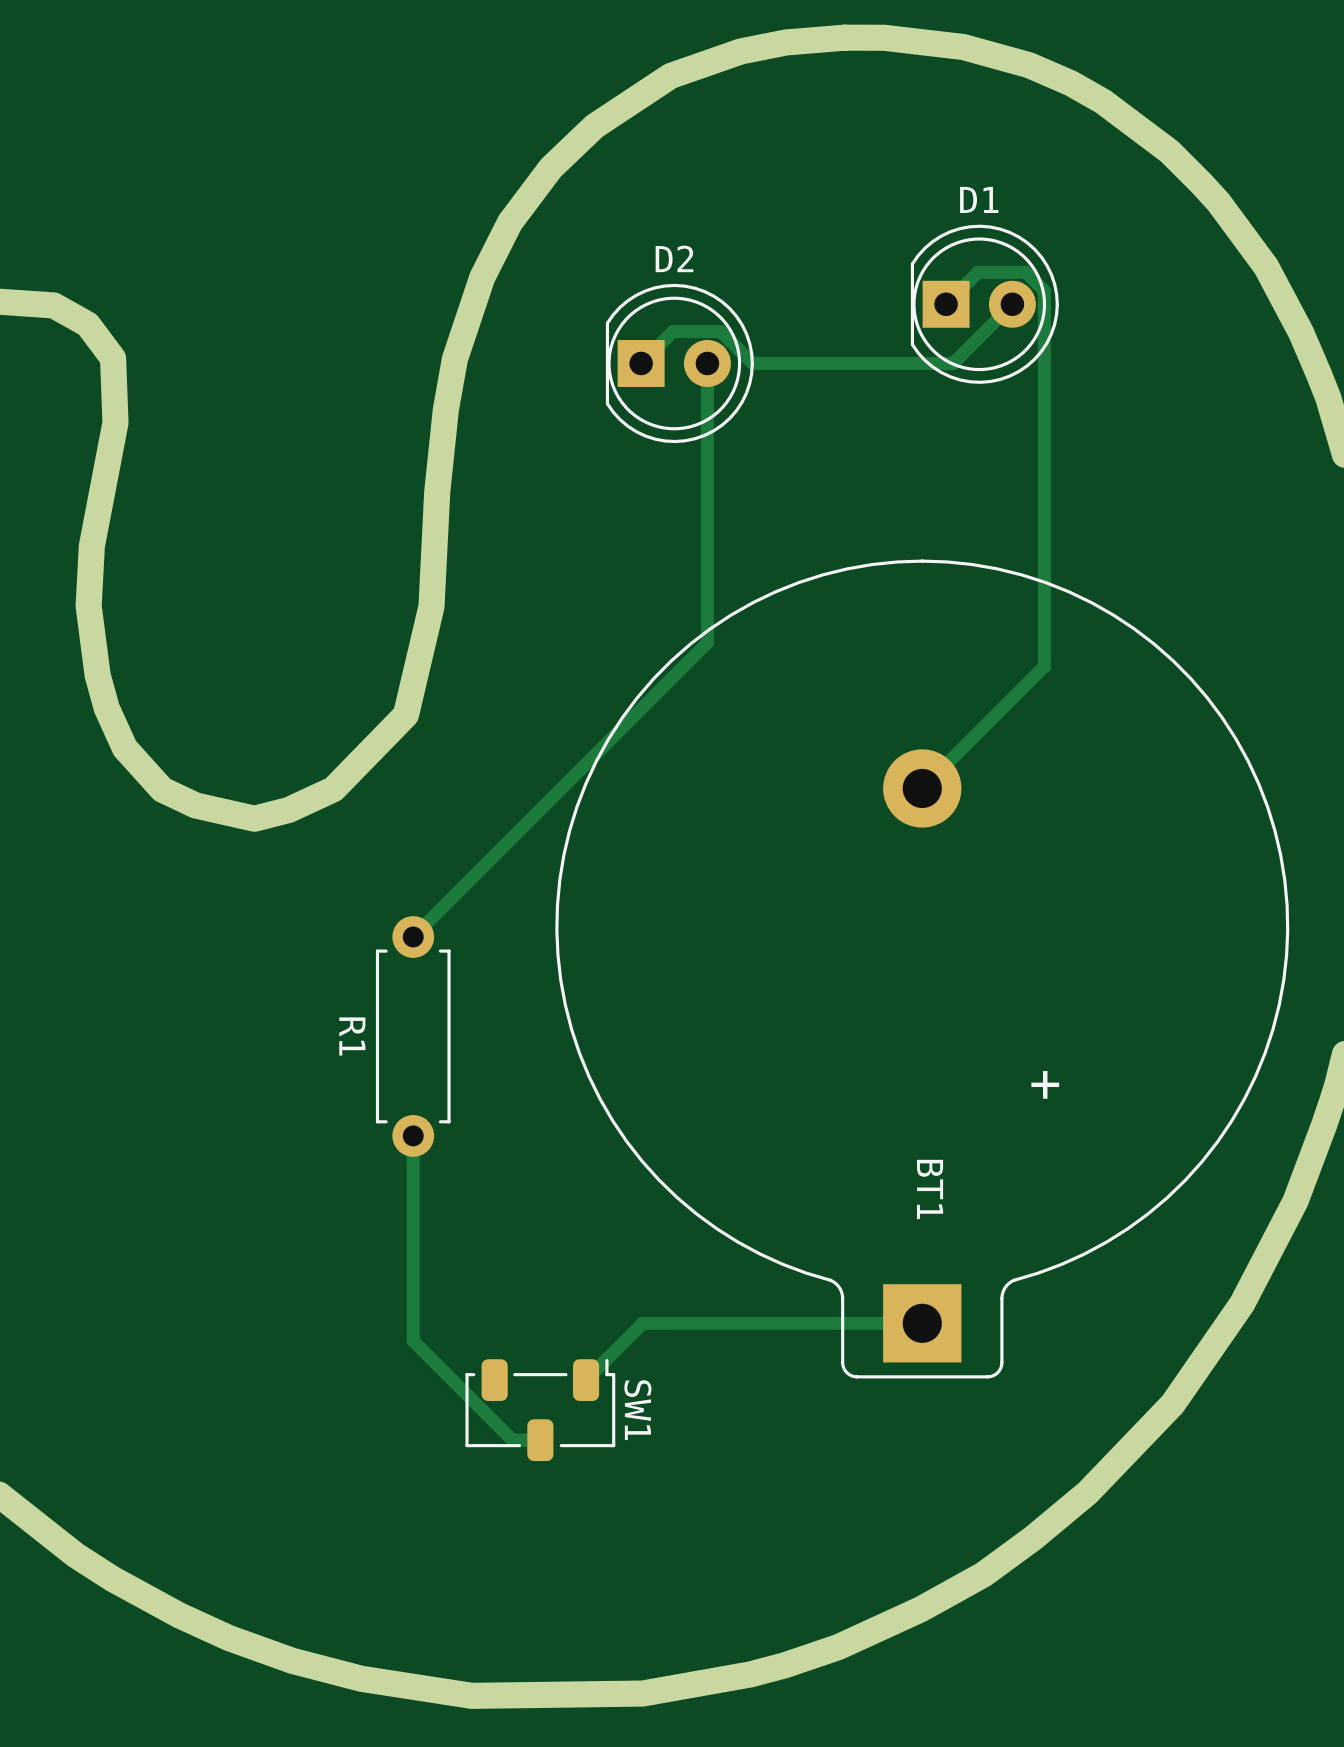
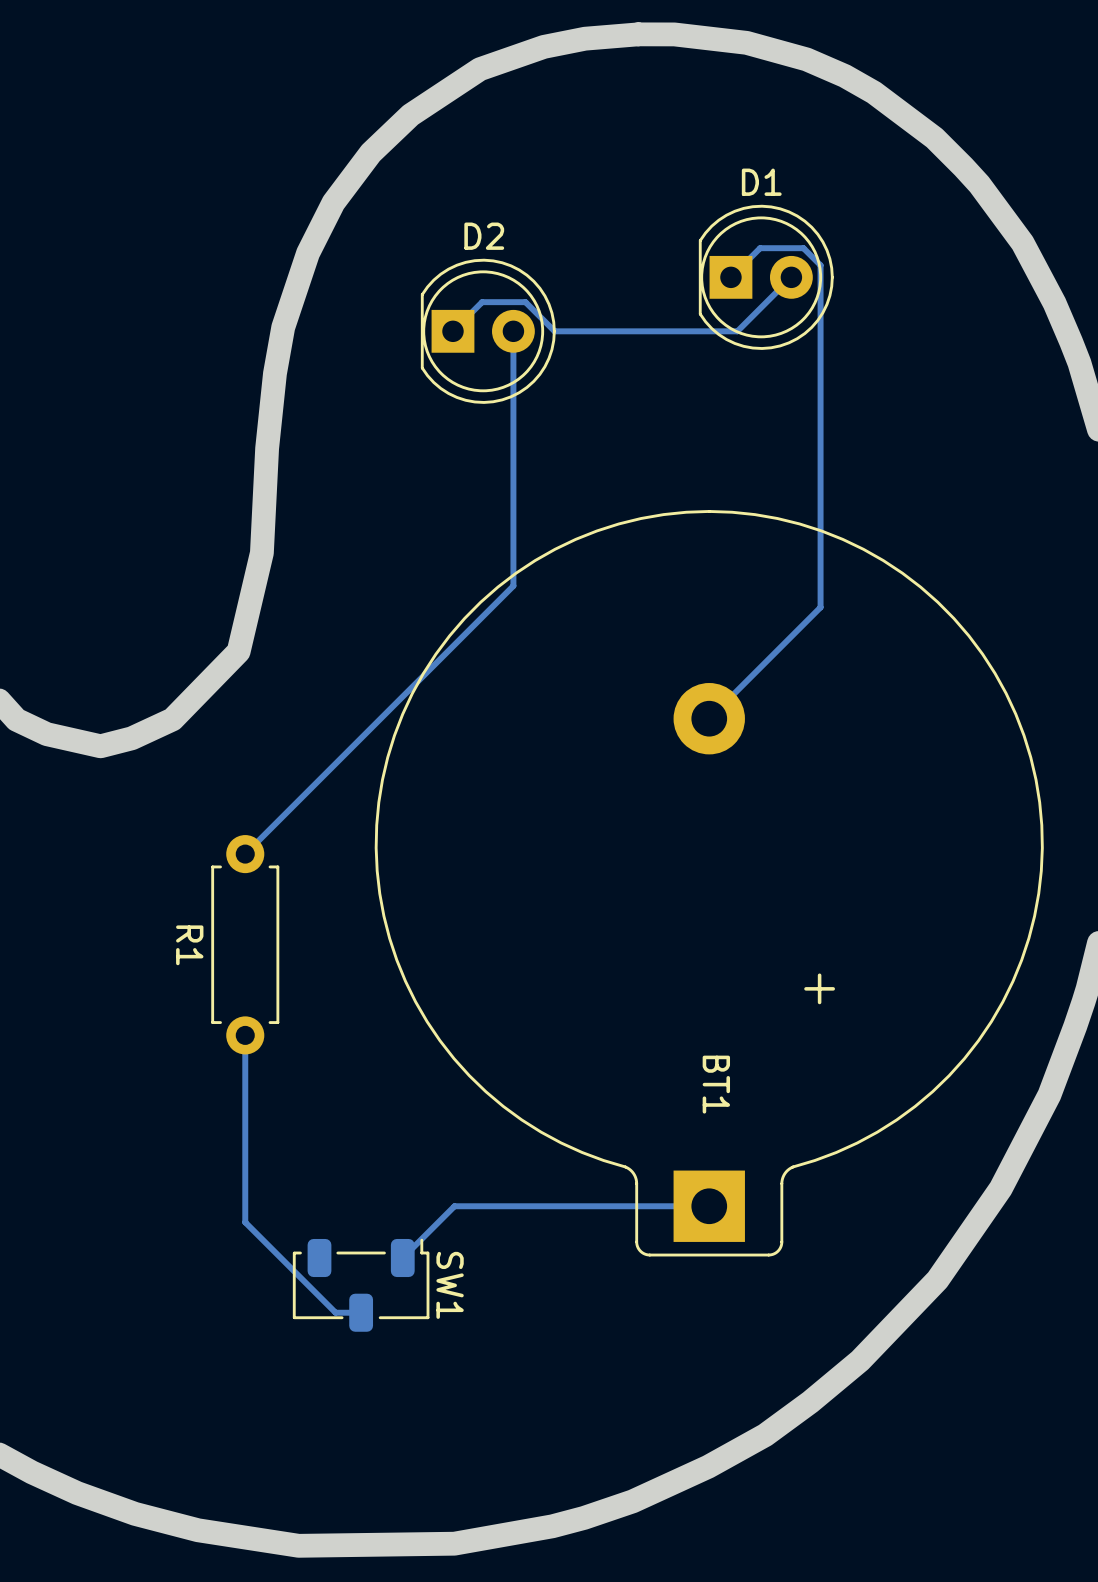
track width: thick (946, 304) (978, 272) (1025, 272) (1044, 291) (1044, 666) (922, 788) -> thin (730, 277) (760, 248) (803, 248) (820, 265) (820, 607) (709, 718)
track width: thick (1012, 304) (953, 363) (752, 363) (720, 331) (673, 331) (641, 363) -> thin (791, 277) (737, 331) (554, 331) (525, 302) (482, 302) (452, 331)
track width: thick (707, 363) (707, 642) (413, 936) -> thin (513, 331) (513, 585) (245, 854)
track width: thick (413, 1135) (413, 1341) (512, 1440) (540, 1440) -> thin (245, 1035) (245, 1222) (335, 1312) (361, 1312)
track width: thick (922, 1323) (642, 1323) (586, 1380) -> thin (709, 1206) (454, 1206) (402, 1258)

